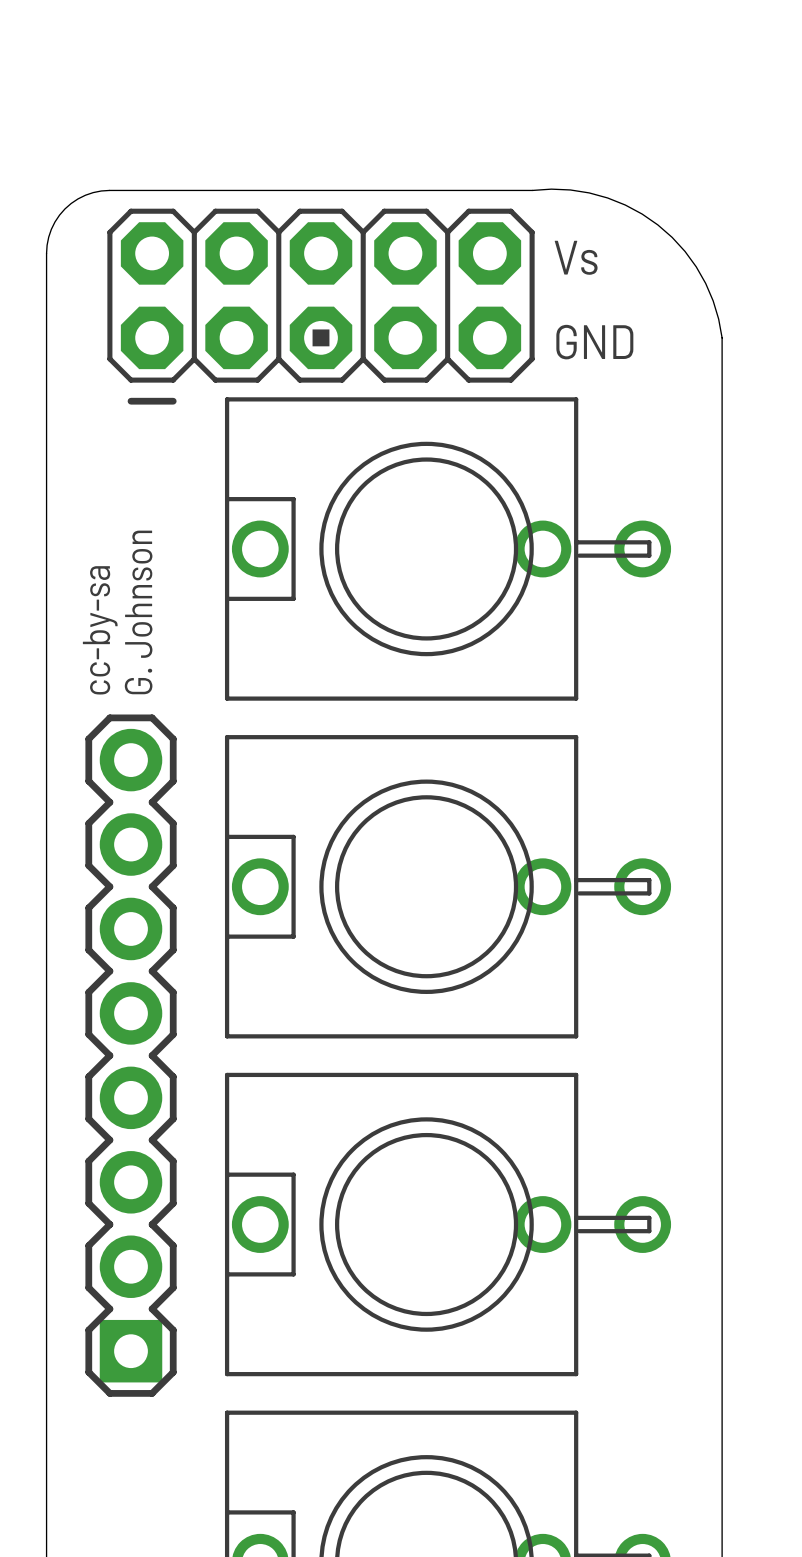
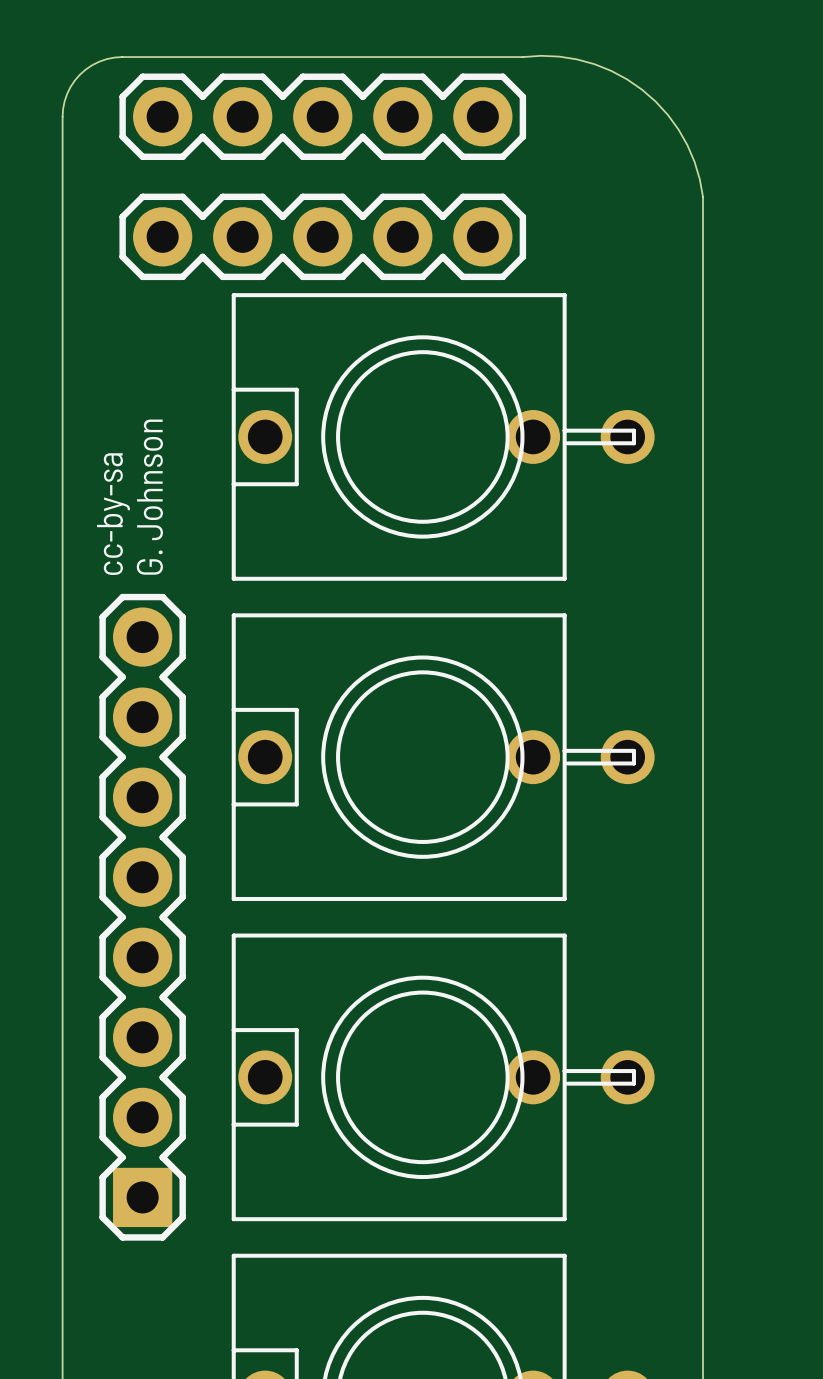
part footprint: [107, 208, 535, 405] -> [119, 193, 527, 281]
part: none -> (322, 116)
board edge: (46, 253) (51, 229) (65, 208) (85, 195) (101, 190) (570, 189) (607, 197) (625, 205) (642, 214) (672, 237) (685, 251) (705, 283) (713, 300) (722, 337) -> (62, 156) (63, 108) (67, 93) (80, 74) (92, 65) (106, 59) (122, 57) (559, 56) (594, 64) (627, 79) (655, 101) (667, 114) (687, 145) (699, 179) (702, 196) (702, 236)
text: Vs (576, 257) -> none
text: GND (594, 342) -> none

